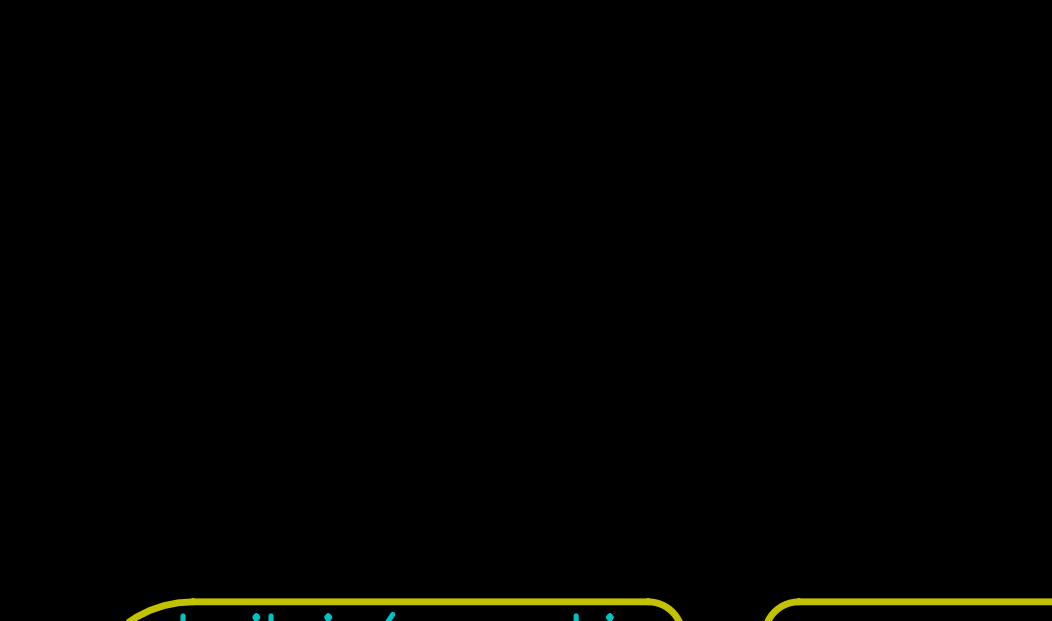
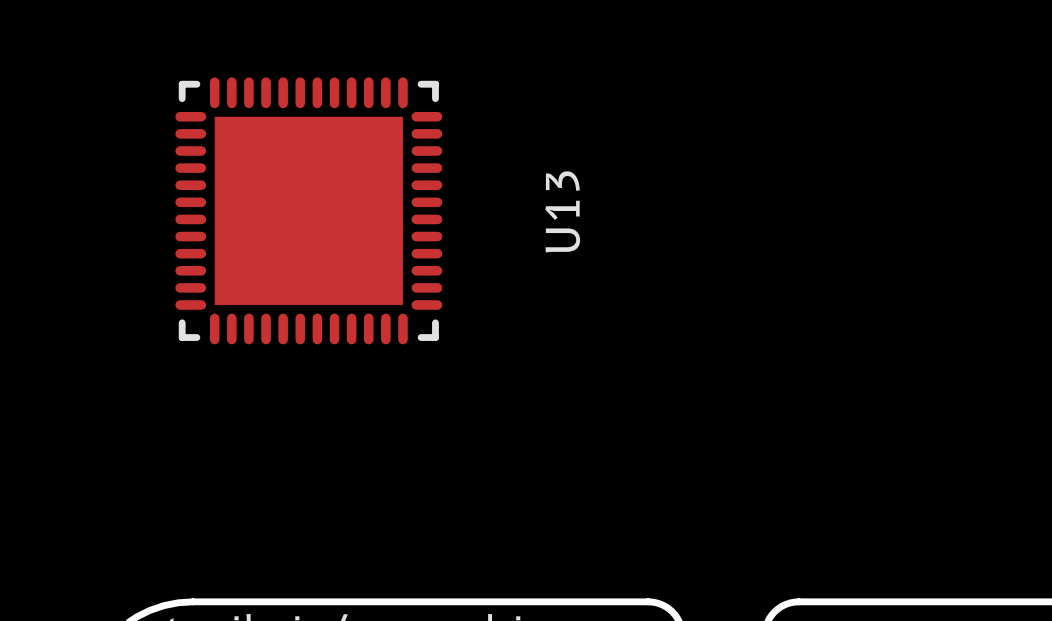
U13: none -> (301, 210)

